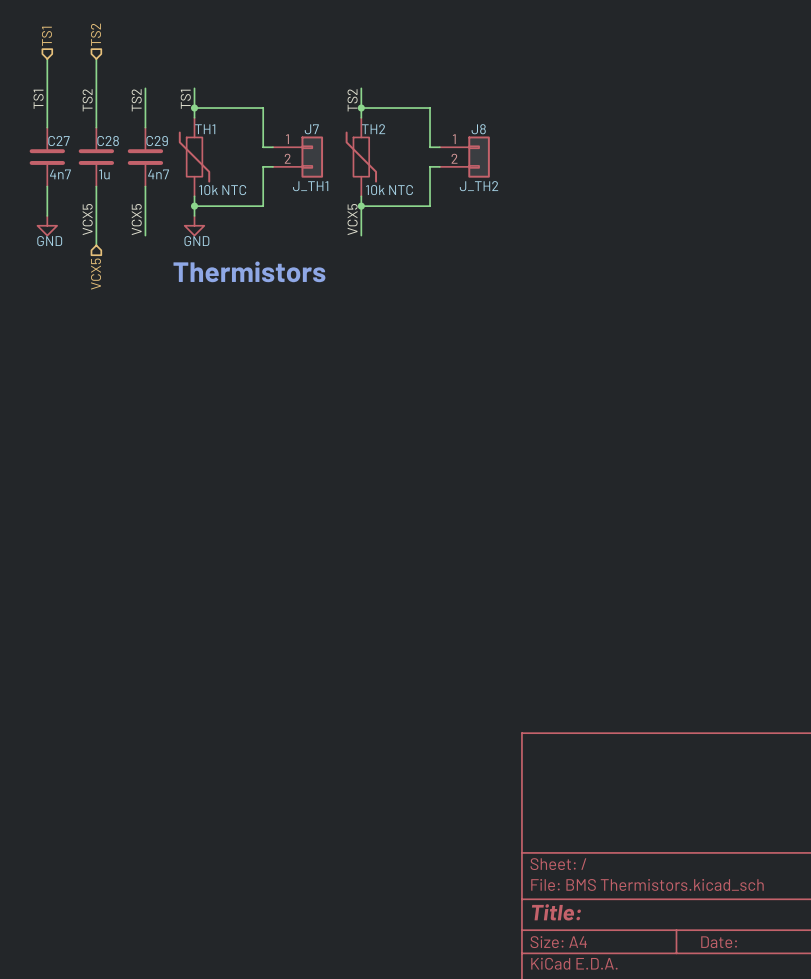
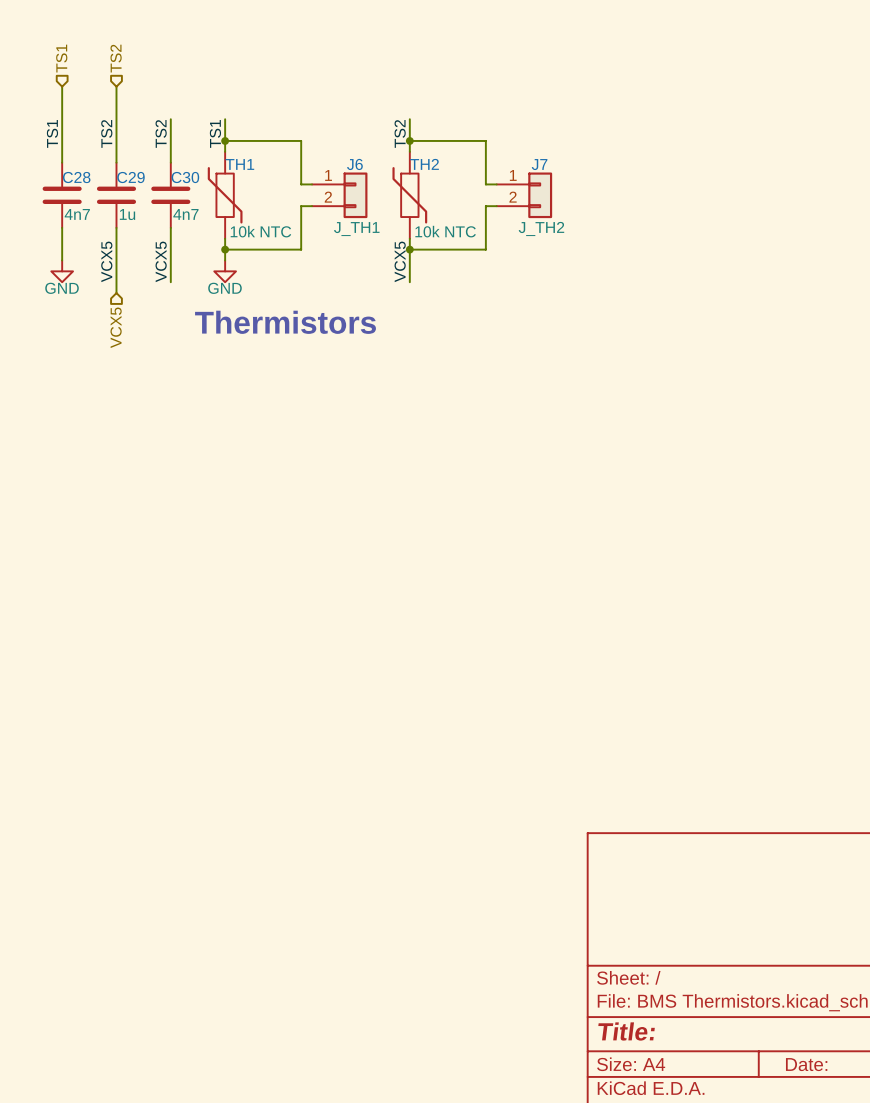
J7 name: J7 (311, 129) -> J6 (354, 164)
J8 name: J8 (478, 129) -> J7 (539, 164)
C27 name: C27 (58, 141) -> C28 (76, 177)
C28 name: C28 (108, 141) -> C29 (131, 177)
C29 name: C29 (157, 141) -> C30 (185, 177)

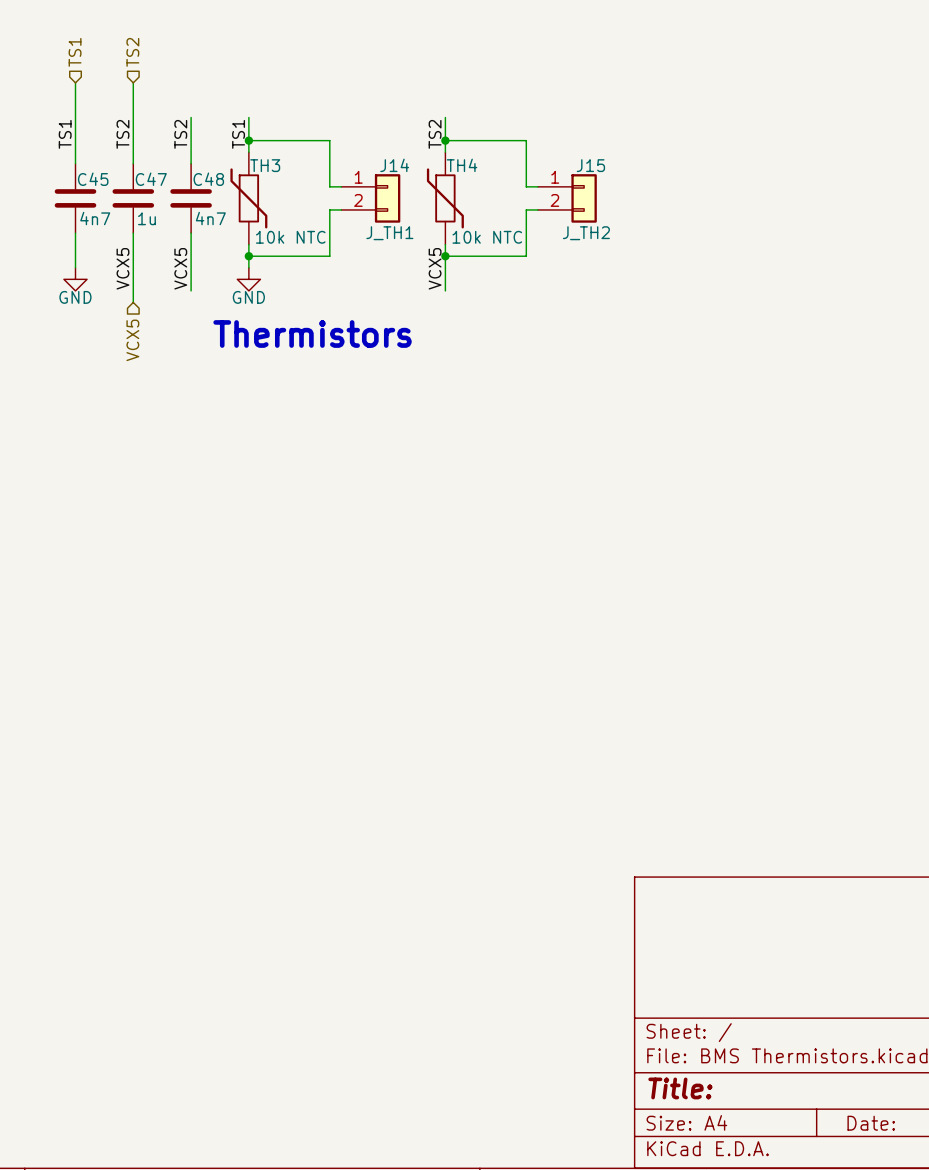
TH1 name: TH1 (239, 164) -> TH3 (265, 165)
J6 name: J6 (354, 164) -> J14 (394, 165)
TH2 name: TH2 (424, 164) -> TH4 (461, 165)
J7 name: J7 (539, 164) -> J15 (590, 165)
C28 name: C28 (76, 177) -> C45 (93, 179)
C29 name: C29 (131, 177) -> C47 (151, 179)
C30 name: C30 (185, 177) -> C48 (208, 179)

